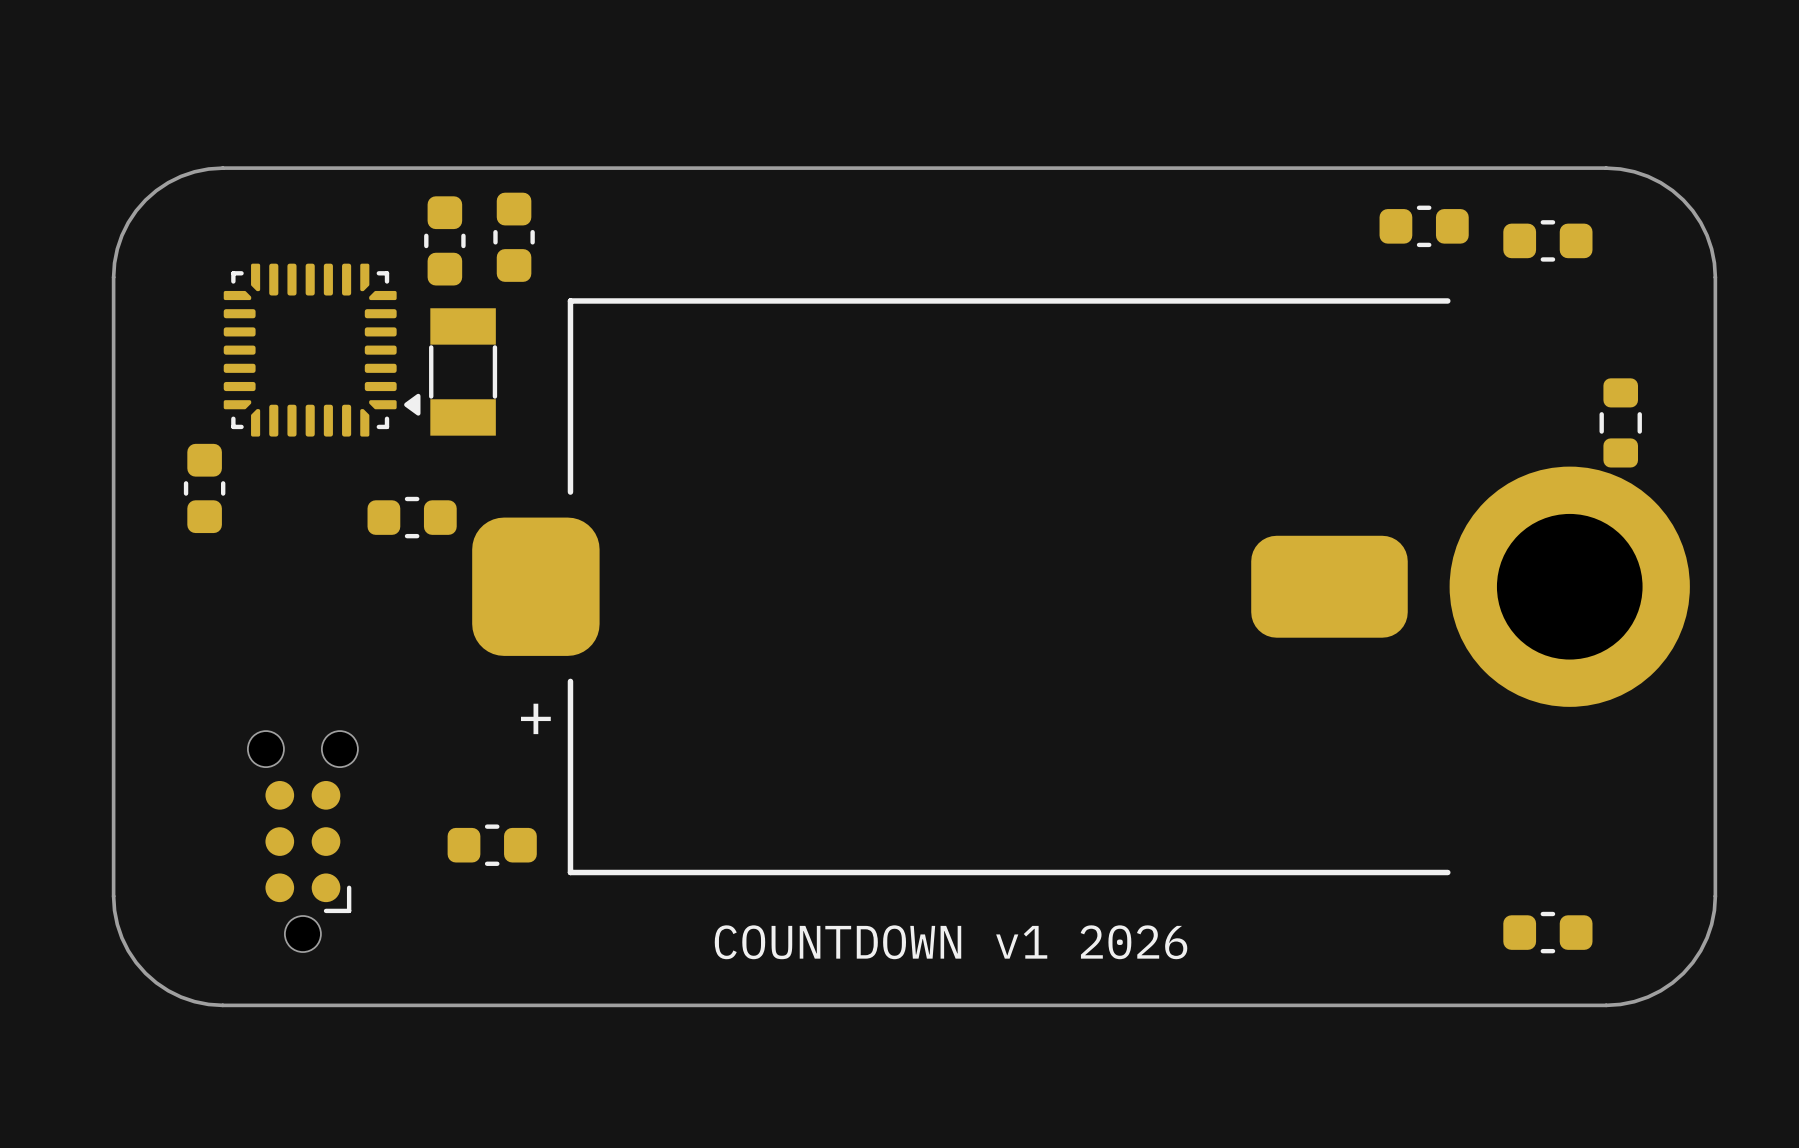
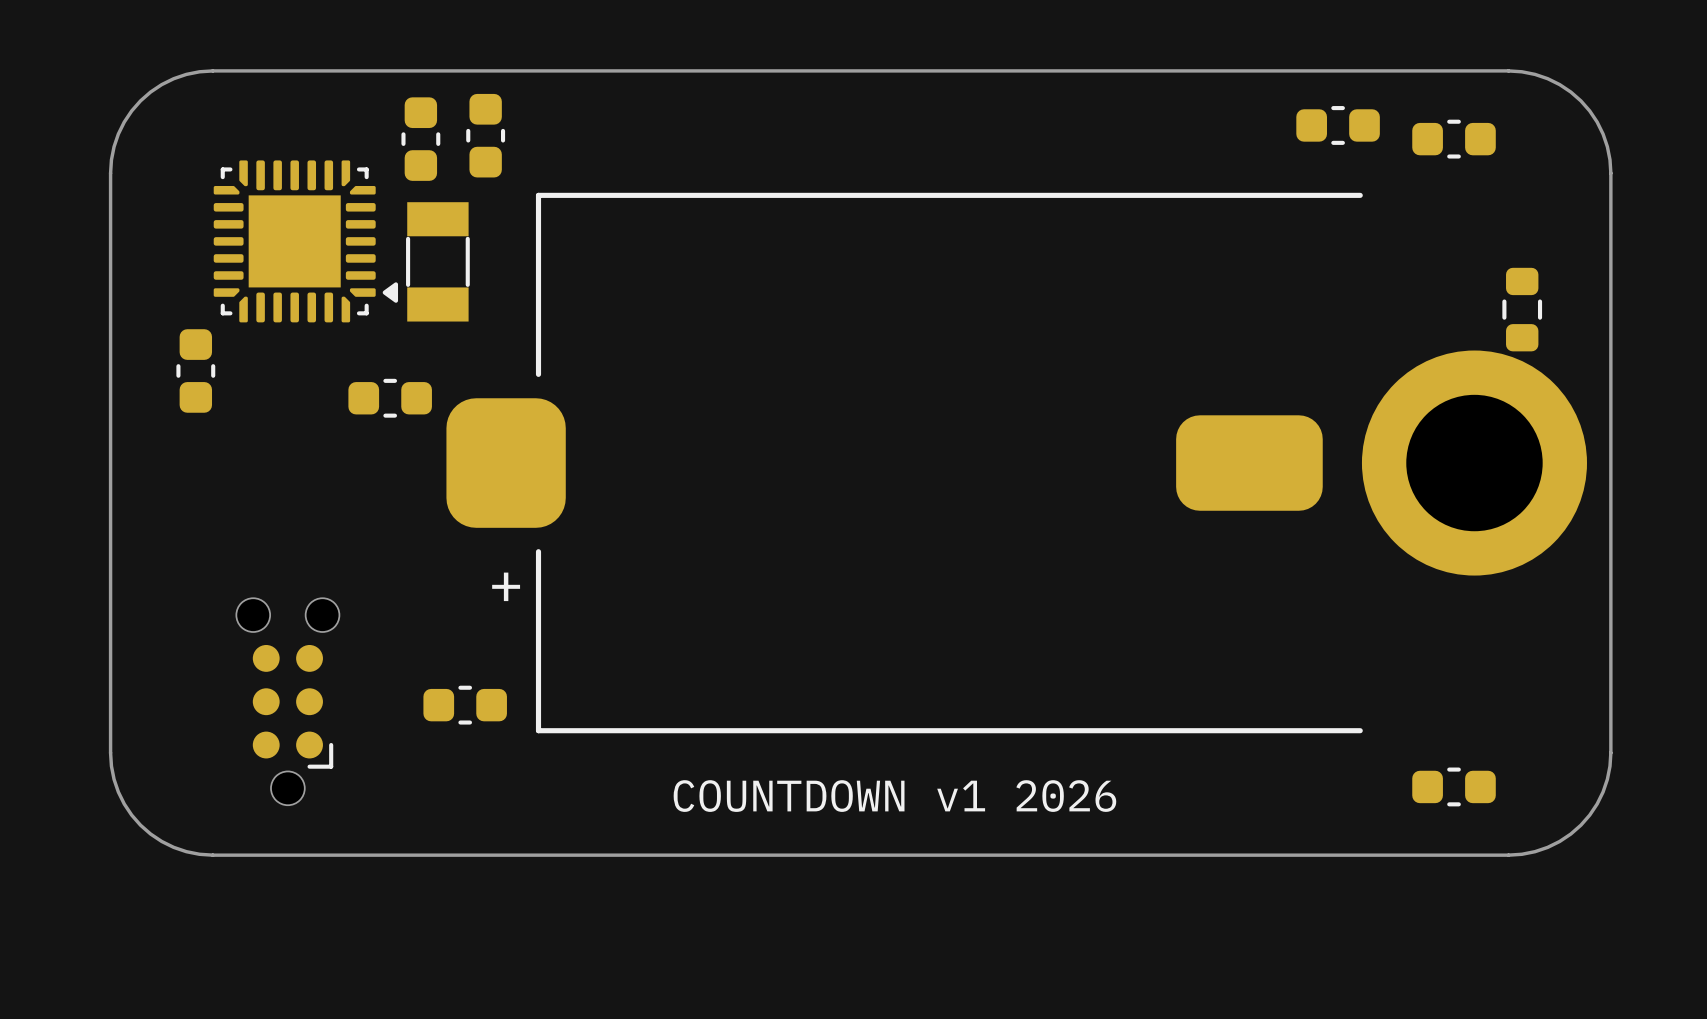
part footprint: [223, 263, 421, 437] -> [213, 160, 399, 323]

